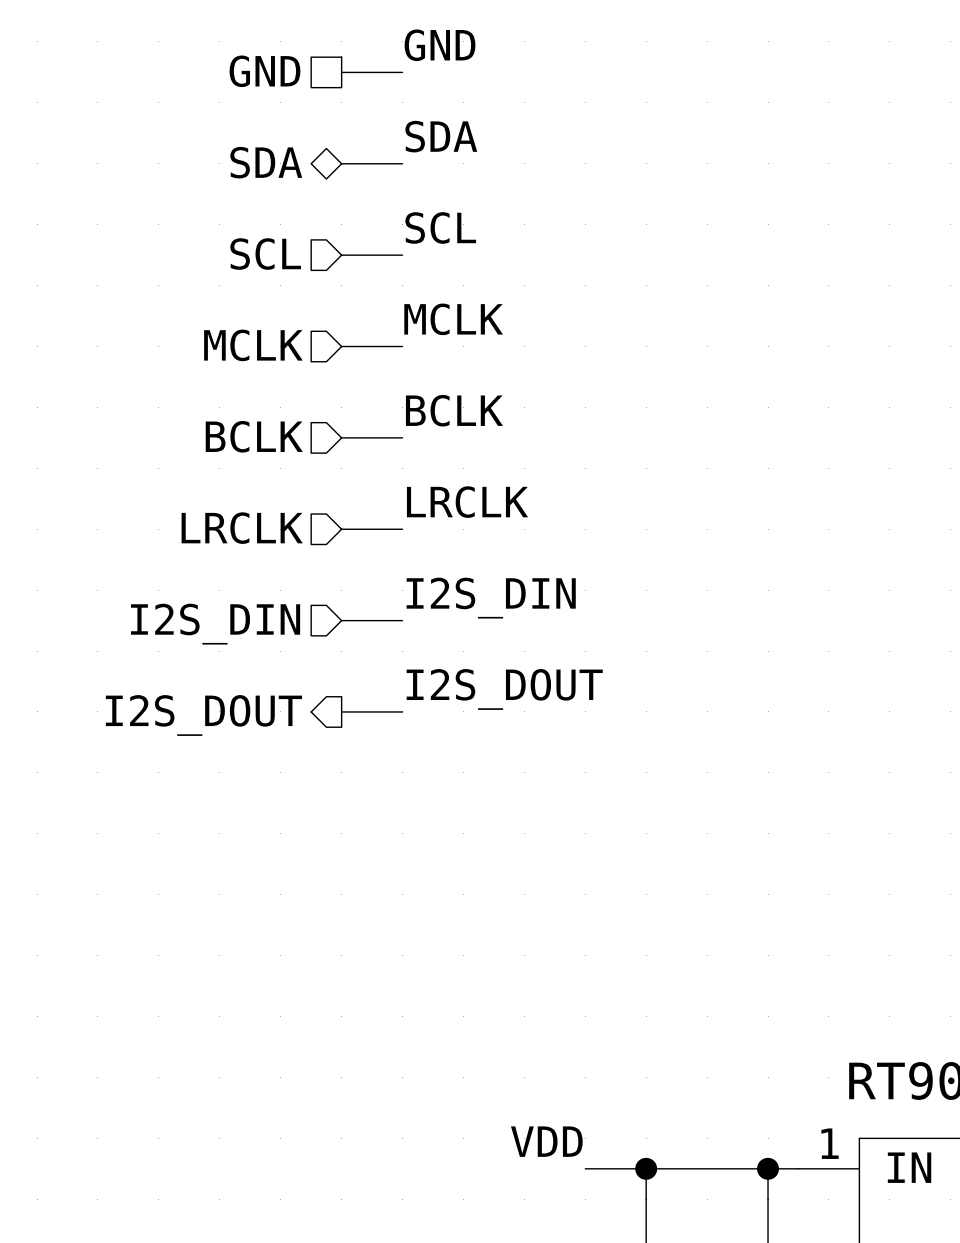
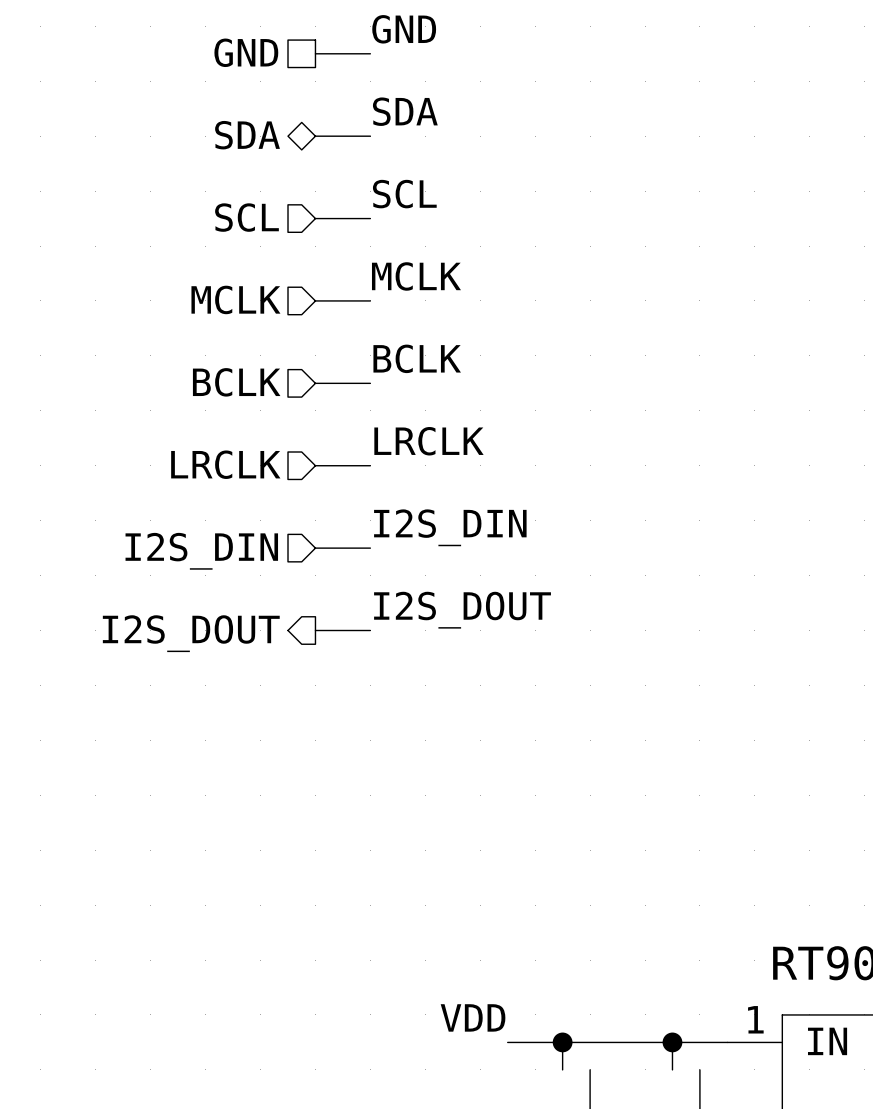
label position: VDD (546, 1141) -> VDD (473, 1017)
wire: none -> (507, 1042) (535, 1042)
wire: (646, 1168) (646, 1199) -> (562, 1042) (562, 1069)
junction position: (646, 1168) -> (562, 1042)
wire: (768, 1168) (768, 1199) -> (672, 1042) (672, 1069)
junction position: (768, 1168) -> (672, 1042)

